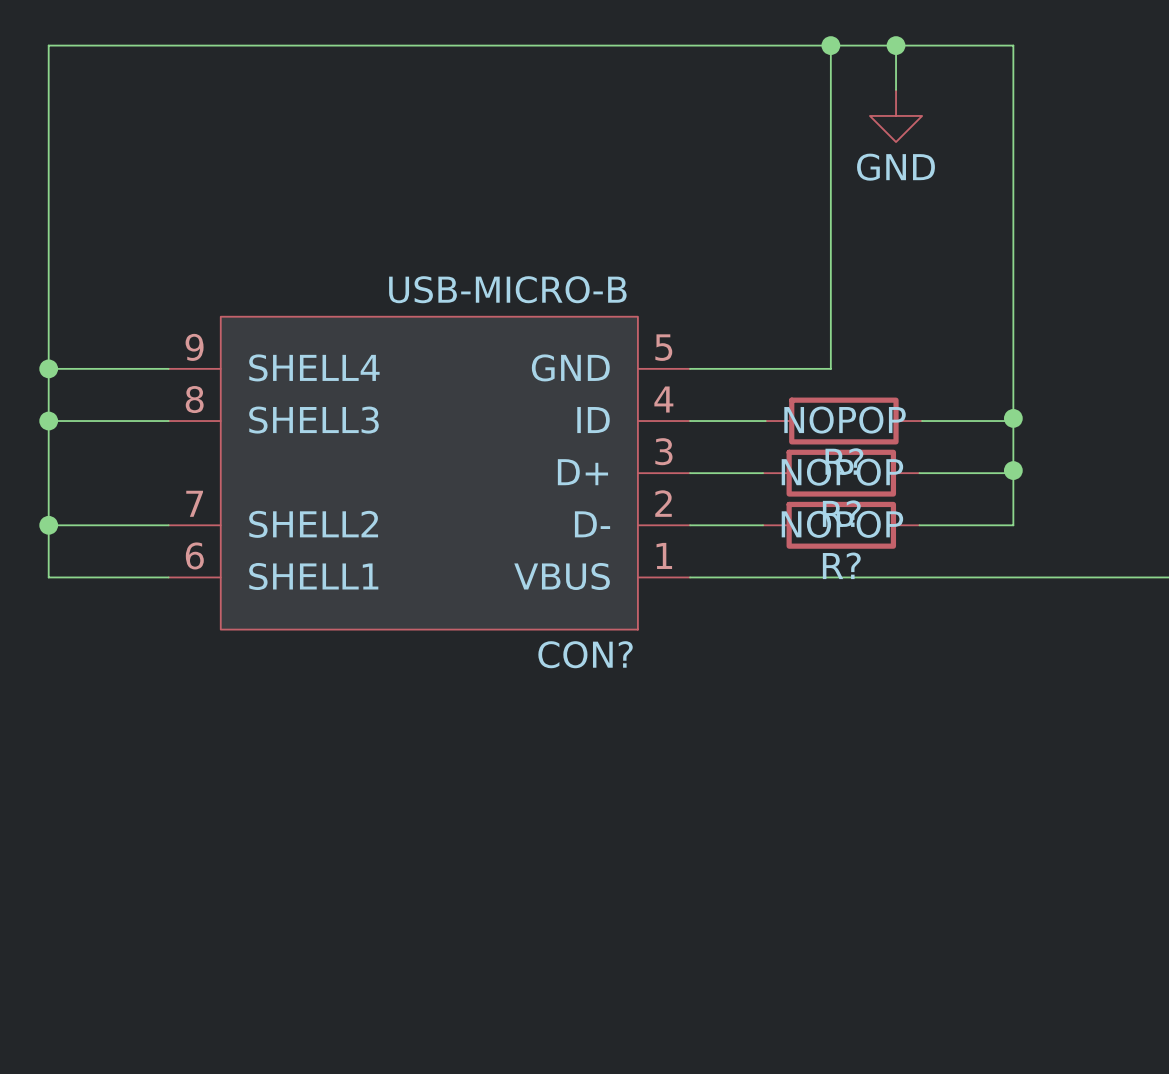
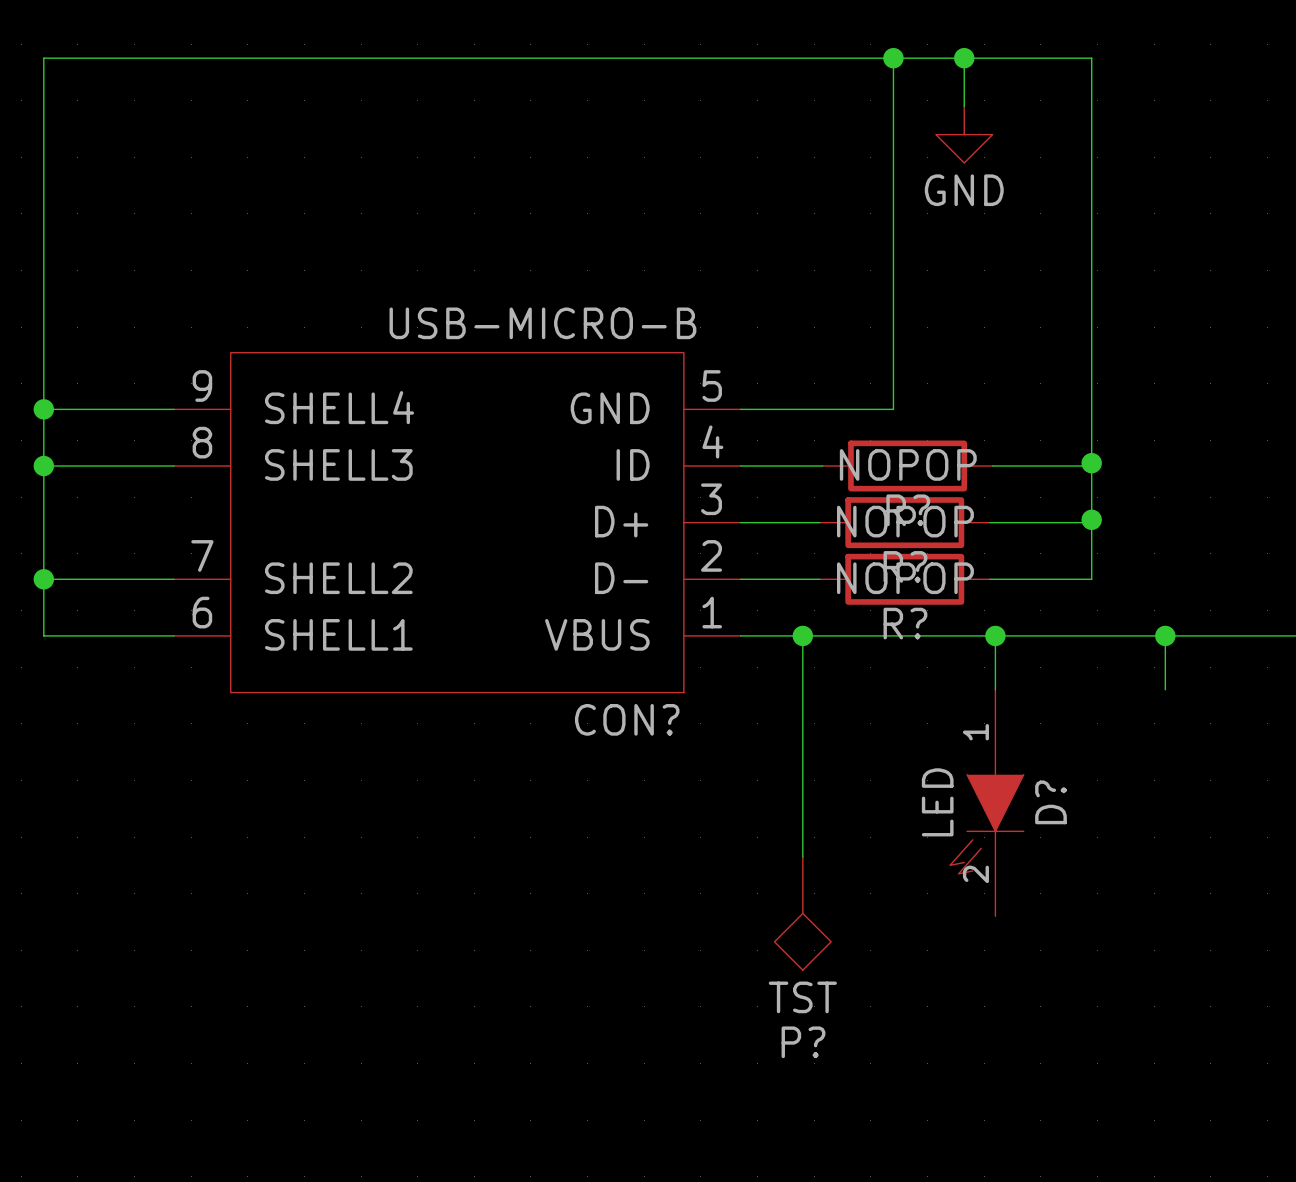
wire: none -> (802, 635) (802, 856)
junction: none -> (802, 635)
wire: none -> (995, 635) (995, 689)
junction: none -> (995, 635)
wire: none -> (1165, 635) (1165, 689)
junction: none -> (1165, 635)
D?: none -> LED (986, 803)
P?: none -> TST (802, 913)

